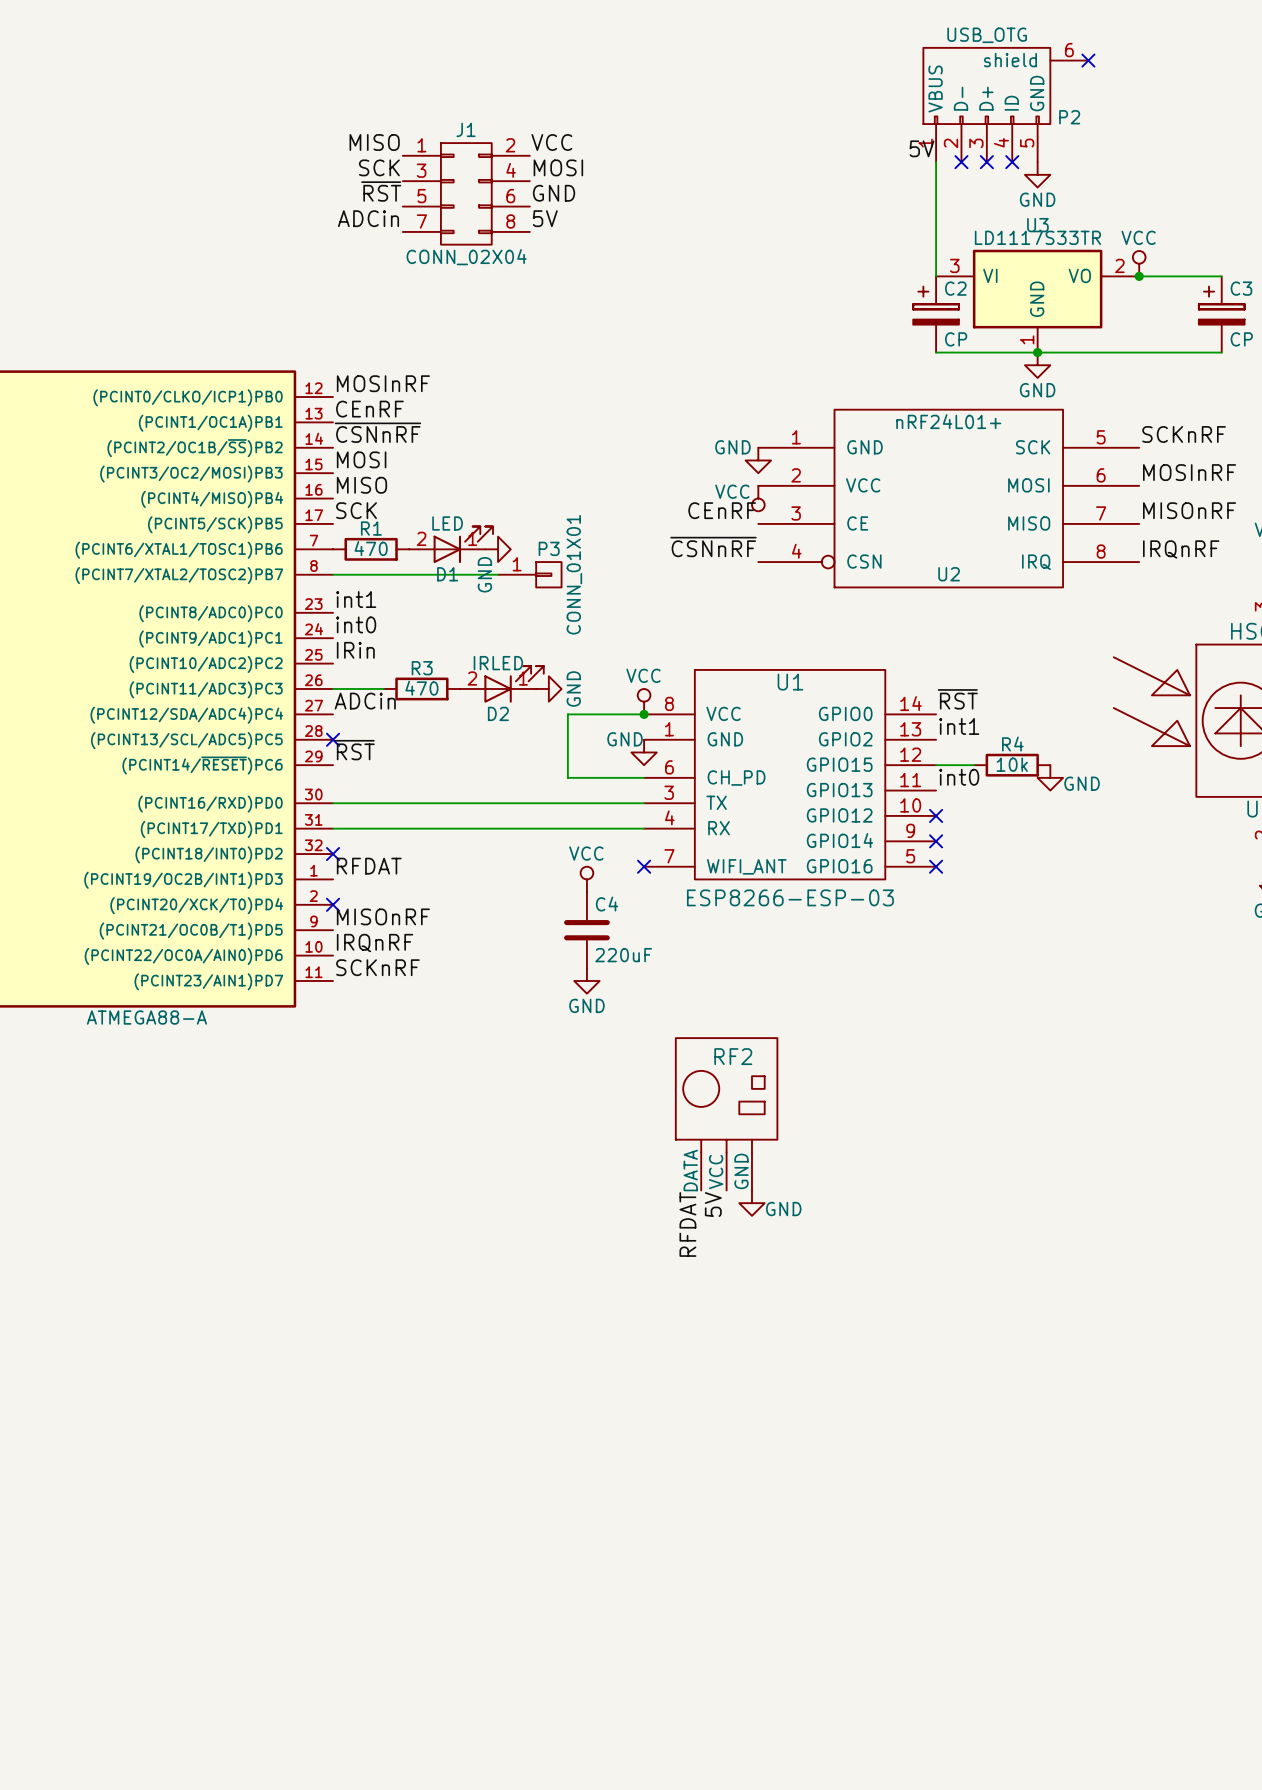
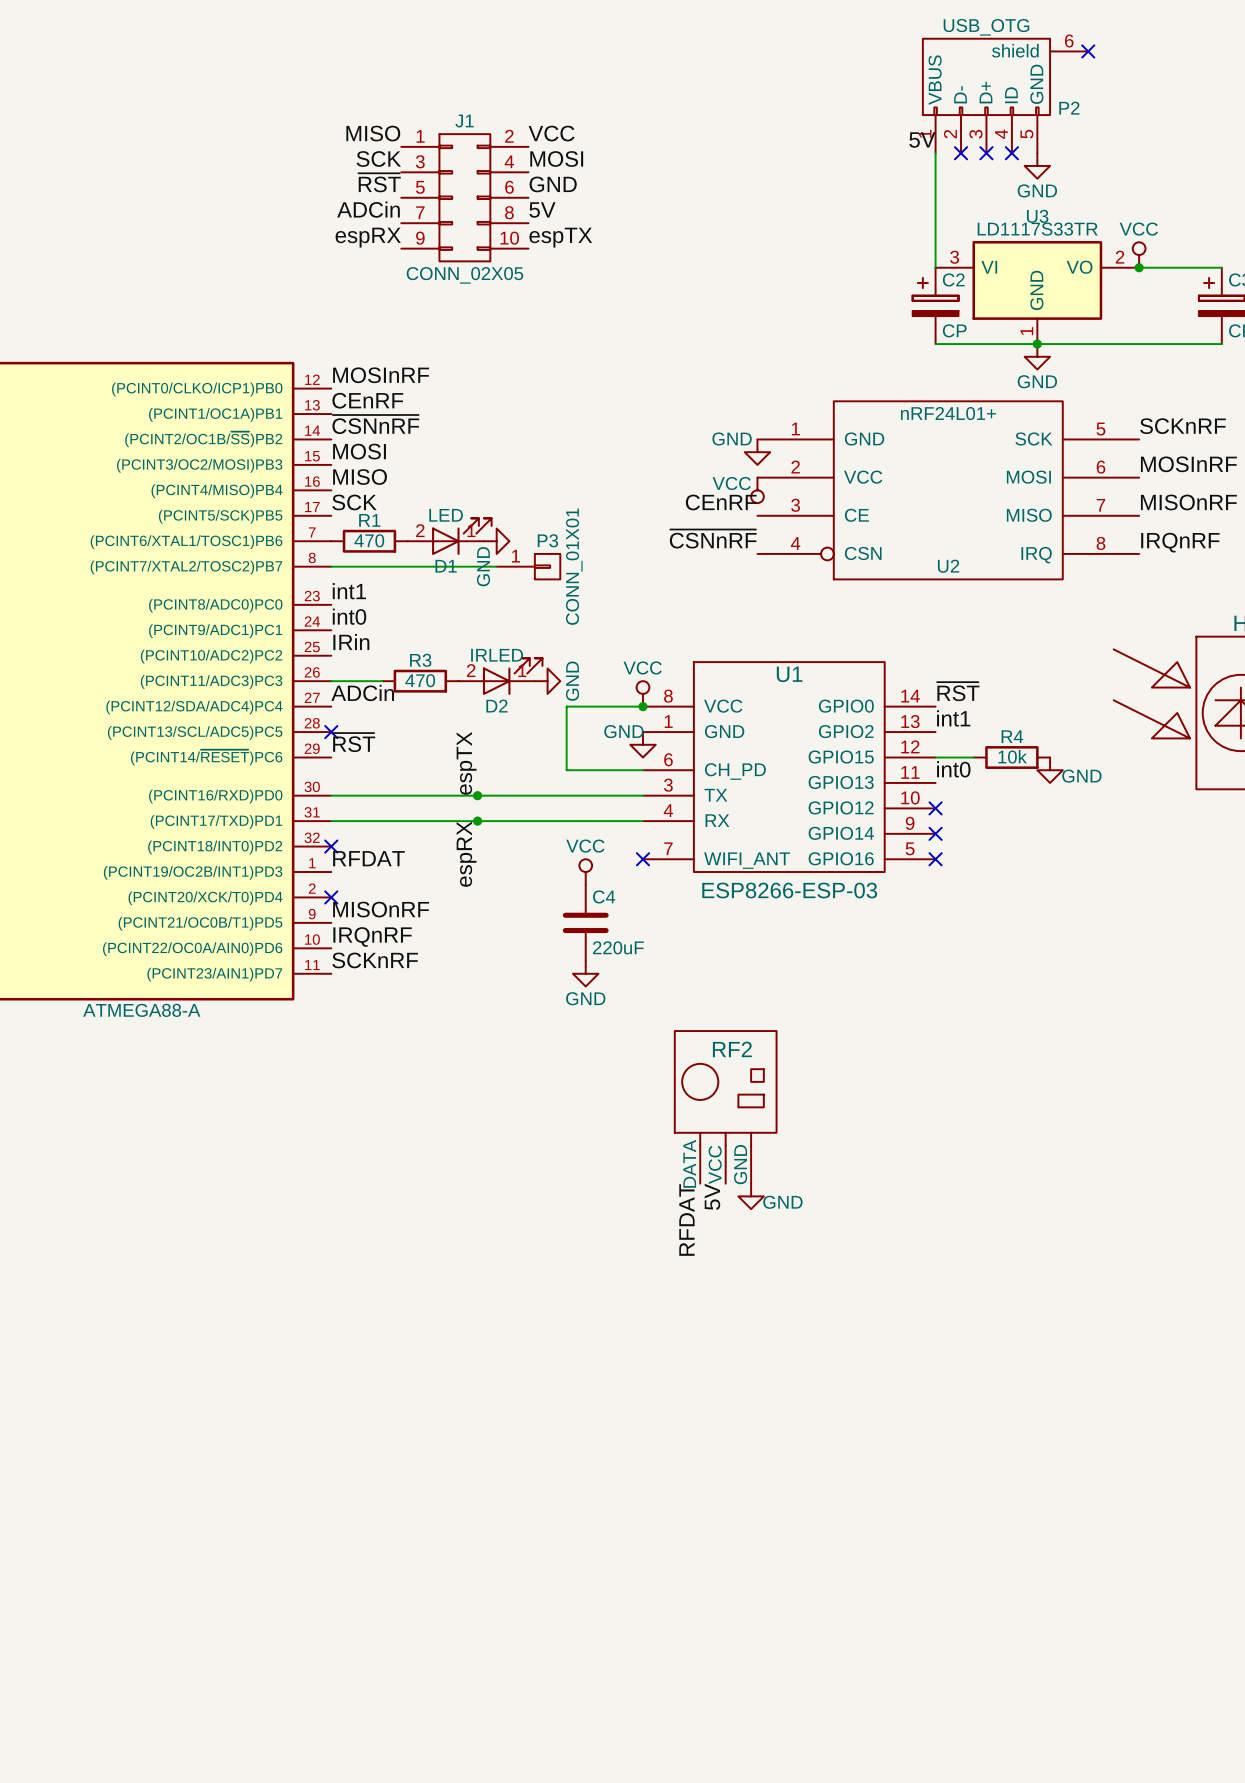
J1 symbol: [402, 143, 530, 245] -> [401, 134, 529, 262]
label: none -> espRX (368, 237)
label: none -> espTX (560, 237)
J1 value: CONN_02X04 (466, 257) -> CONN_02X05 (464, 275)
label: none -> espTX (466, 763)
junction: none -> (477, 795)
junction: none -> (477, 821)
label: none -> espRX (466, 854)

